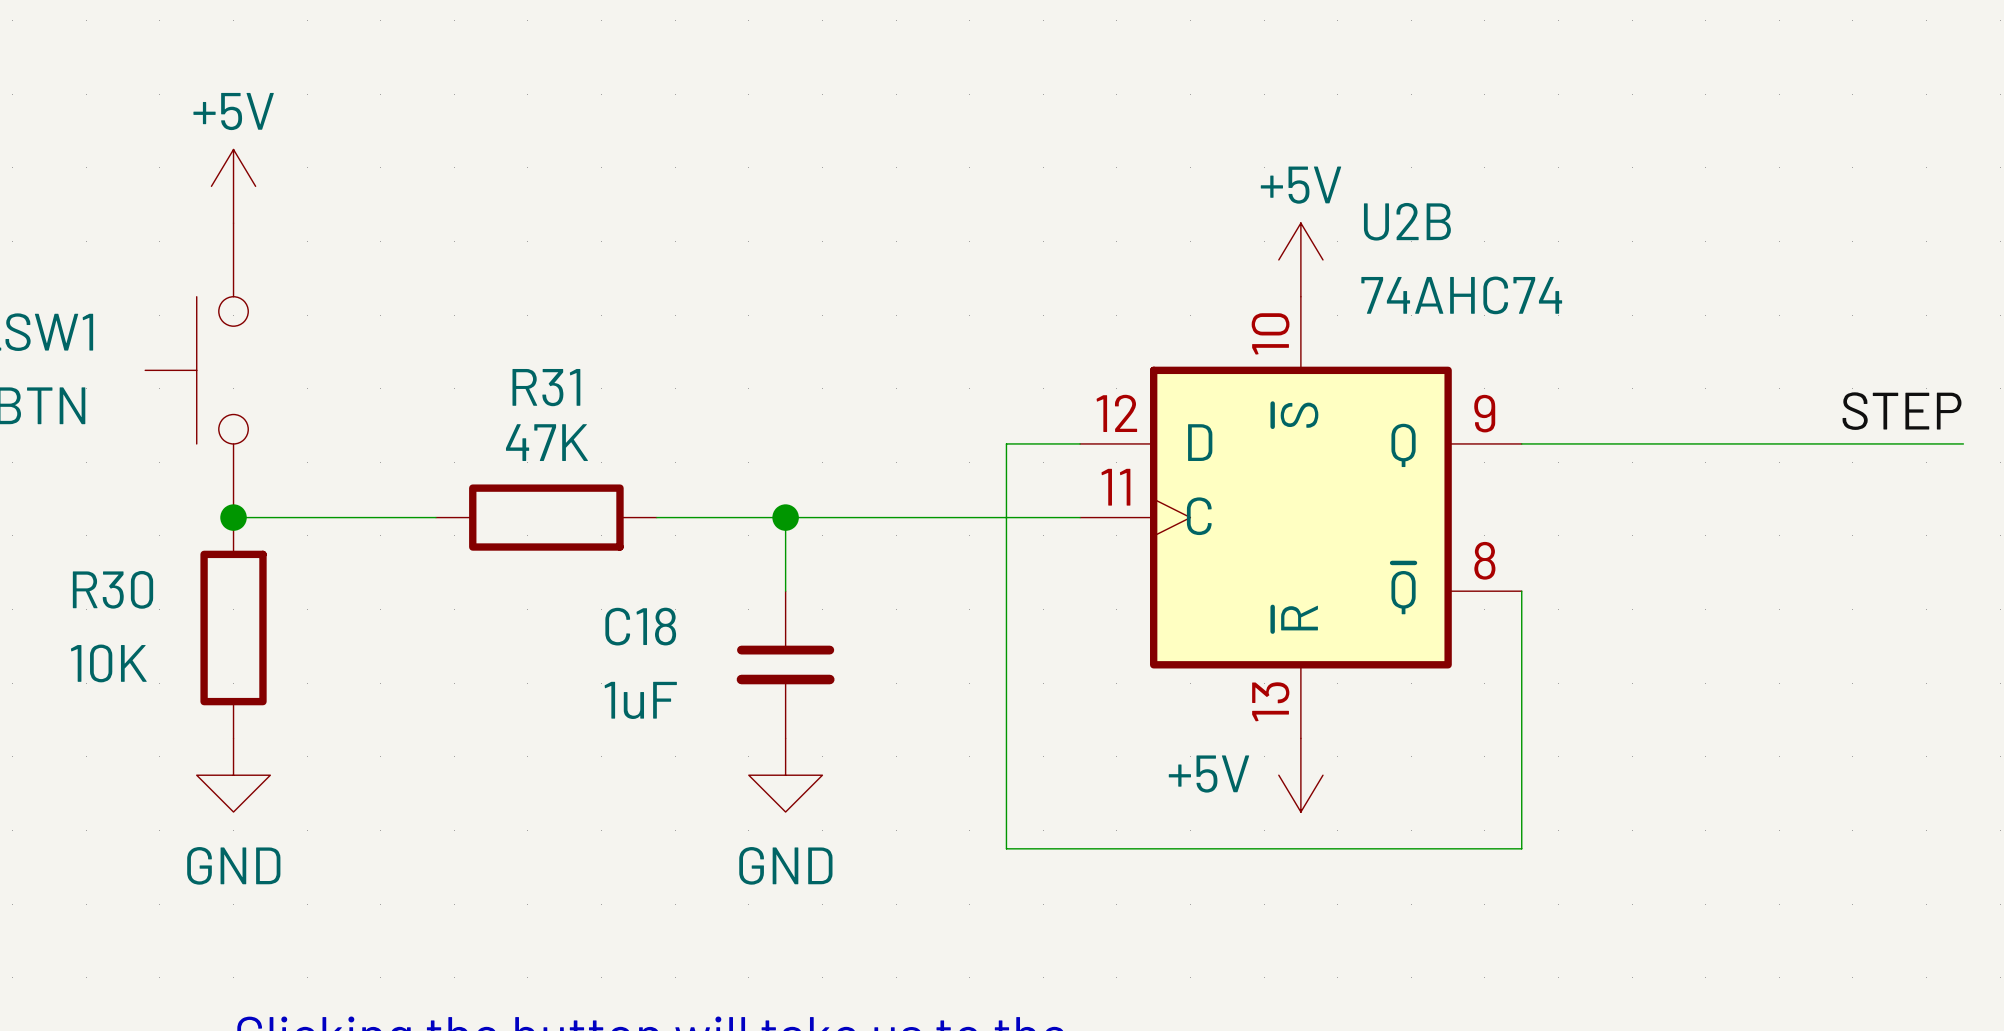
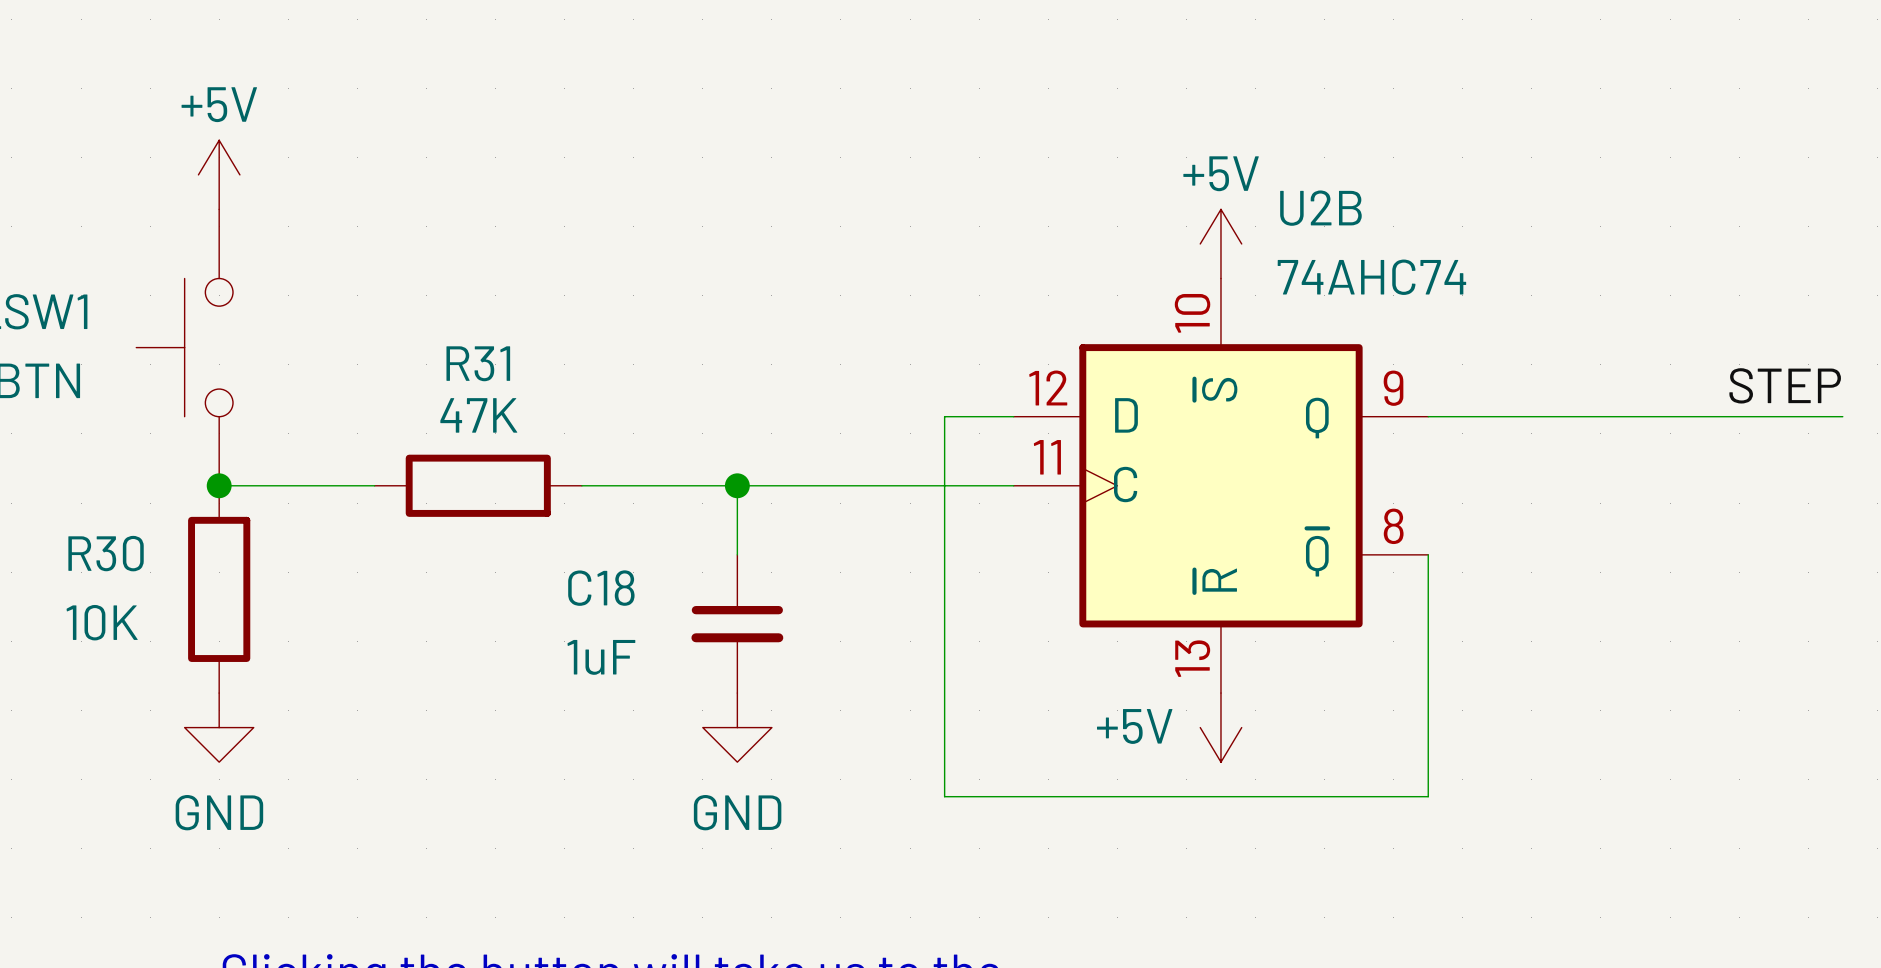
R31 position: (546, 517) -> (478, 485)

